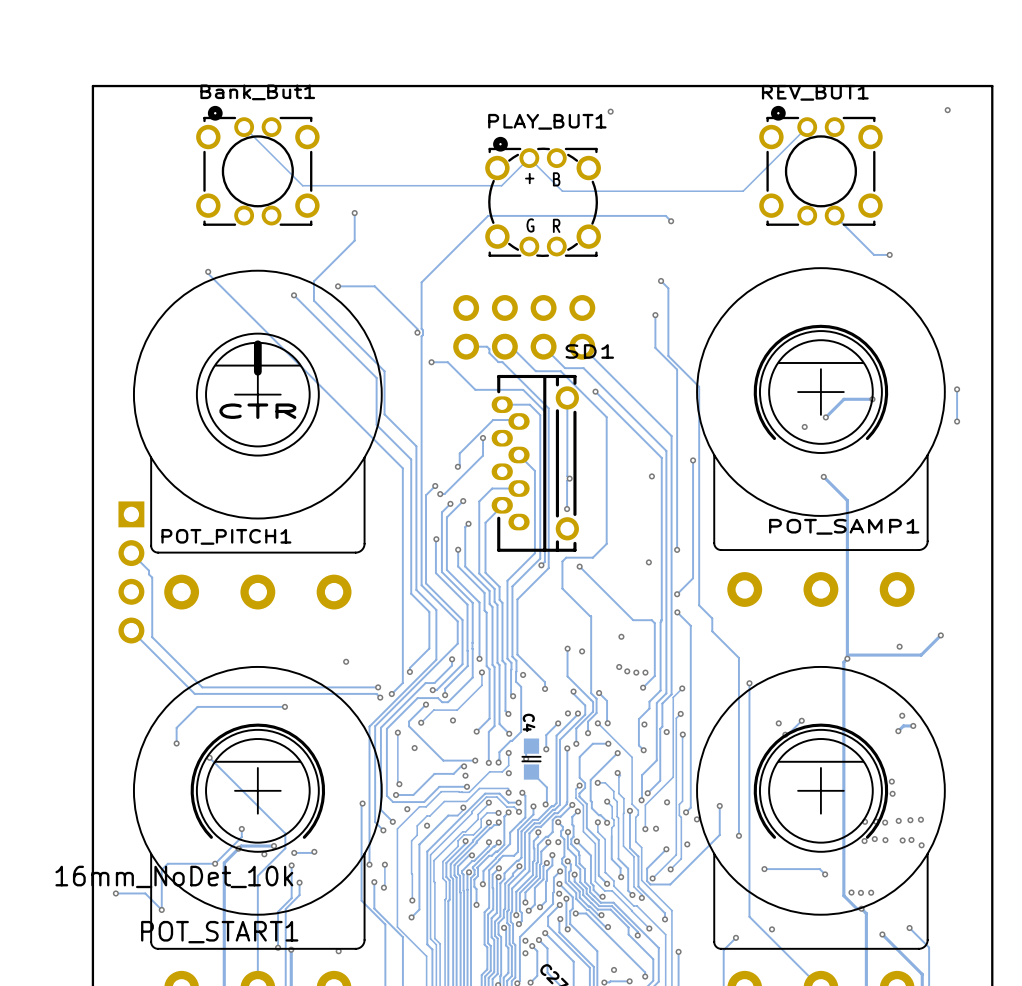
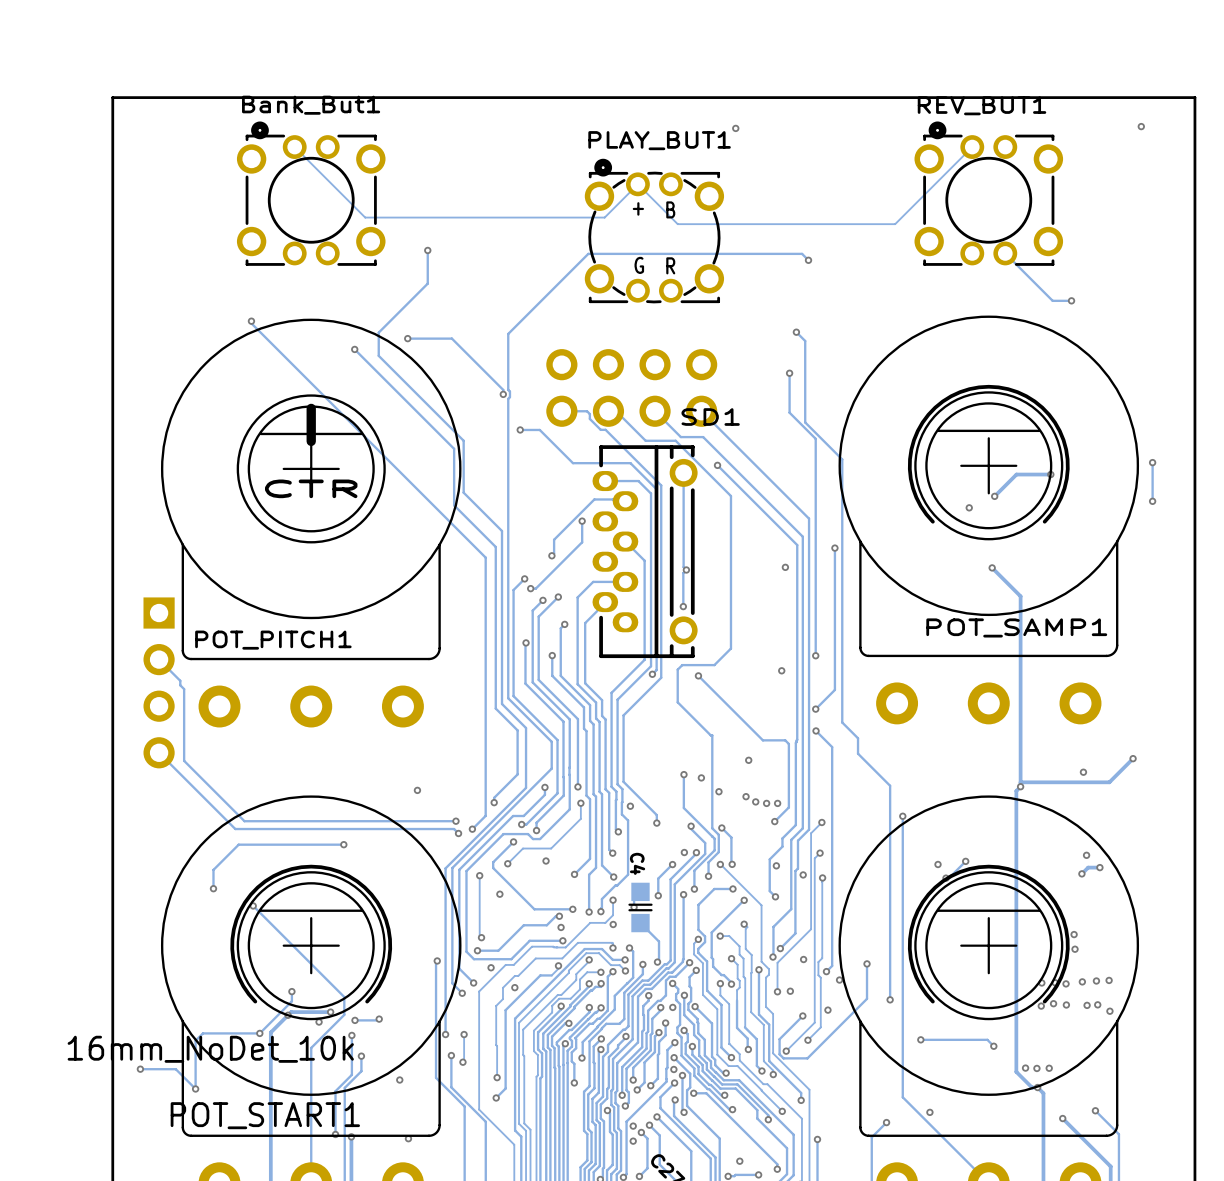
via: none -> (718, 791)
via: none -> (399, 1080)

